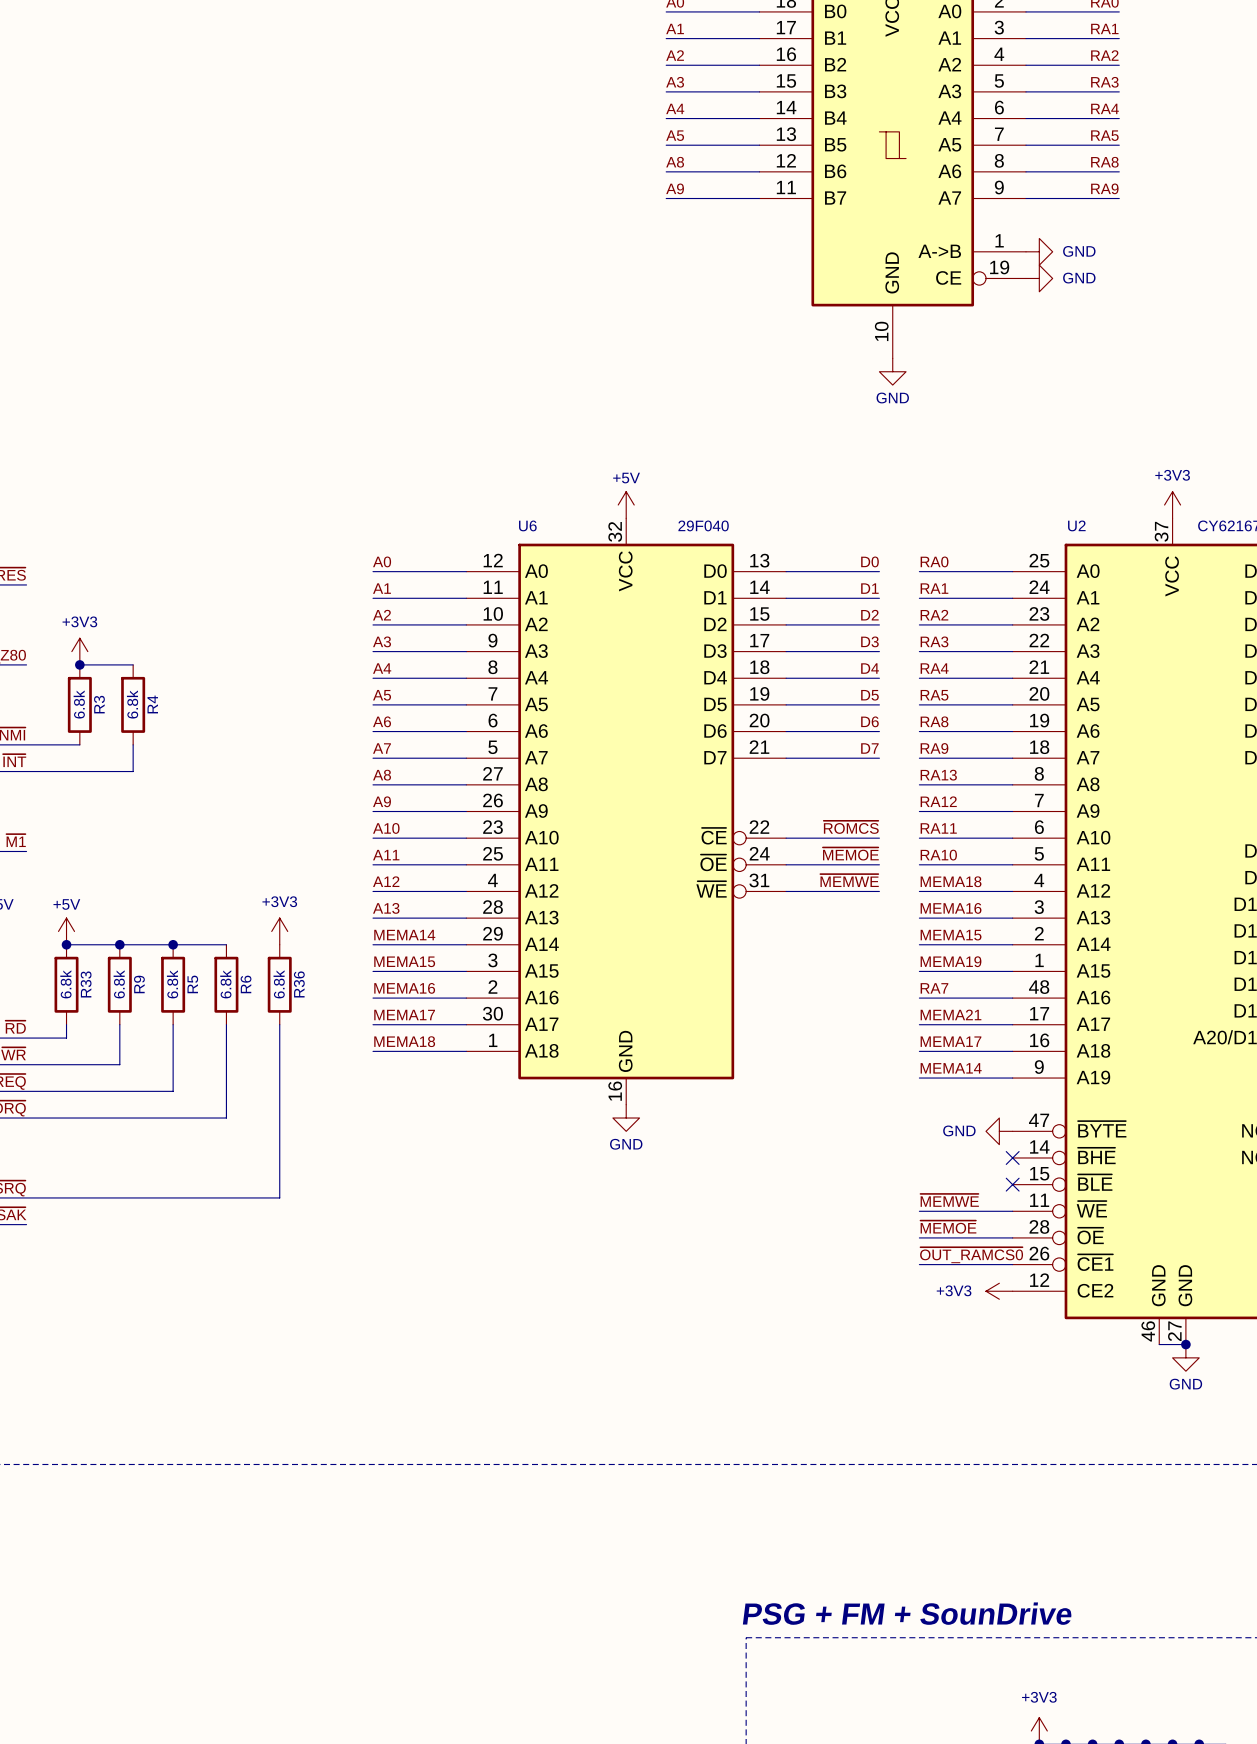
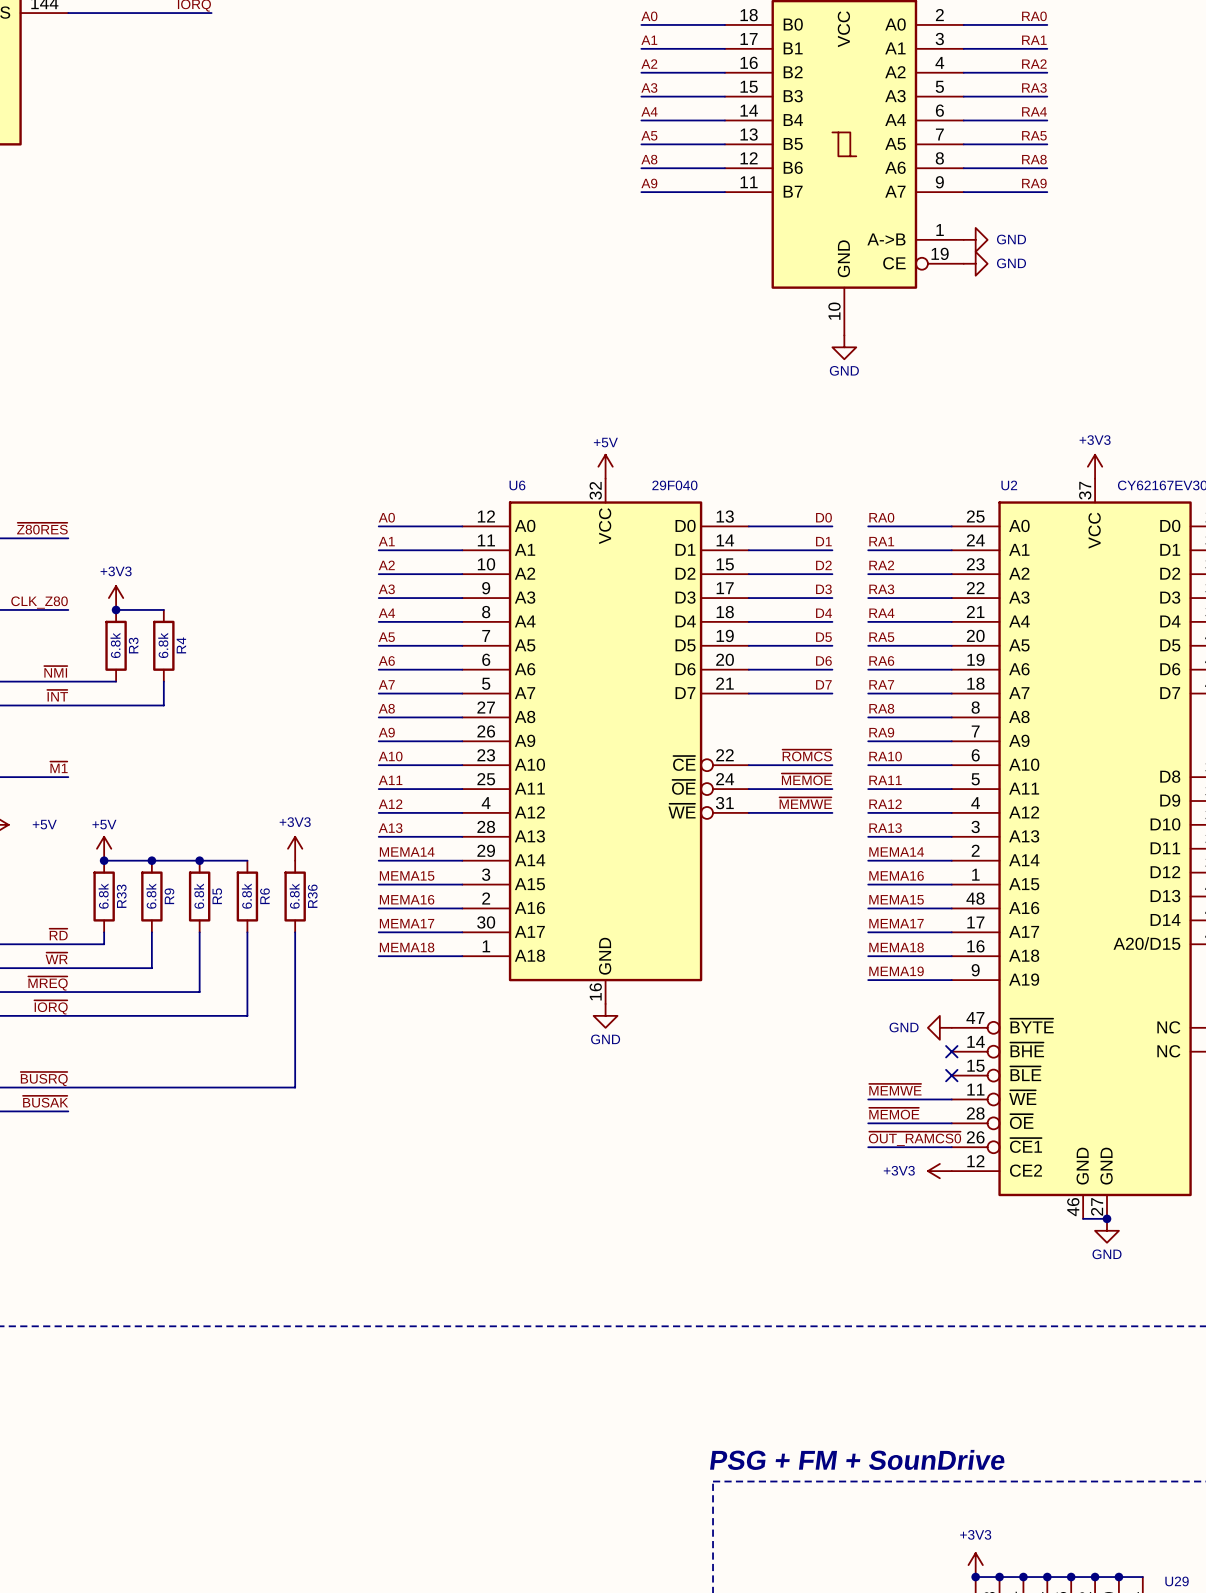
label: RA8 (934, 721) -> RA6 (881, 660)
label: RA9 (934, 748) -> RA7 (881, 684)
label: RA13 (938, 775) -> RA8 (881, 708)
label: RA12 (938, 801) -> RA9 (881, 732)
label: RA11 (938, 828) -> RA10 (885, 756)
label: RA10 (938, 855) -> RA11 (885, 780)
label: MEMA18 (951, 881) -> RA12 (885, 804)
label: MEMA16 (951, 908) -> RA13 (885, 828)
label: MEMA15 (951, 935) -> MEMA14 (896, 852)
label: MEMA19 (951, 961) -> MEMA16 (896, 875)
label: RA7 (934, 988) -> MEMA15 (896, 899)
label: MEMA21 (951, 1014) -> MEMA17 (896, 923)
label: MEMA17 (950, 1041) -> MEMA18 (896, 947)
label: MEMA14 (951, 1068) -> MEMA19 (896, 971)

